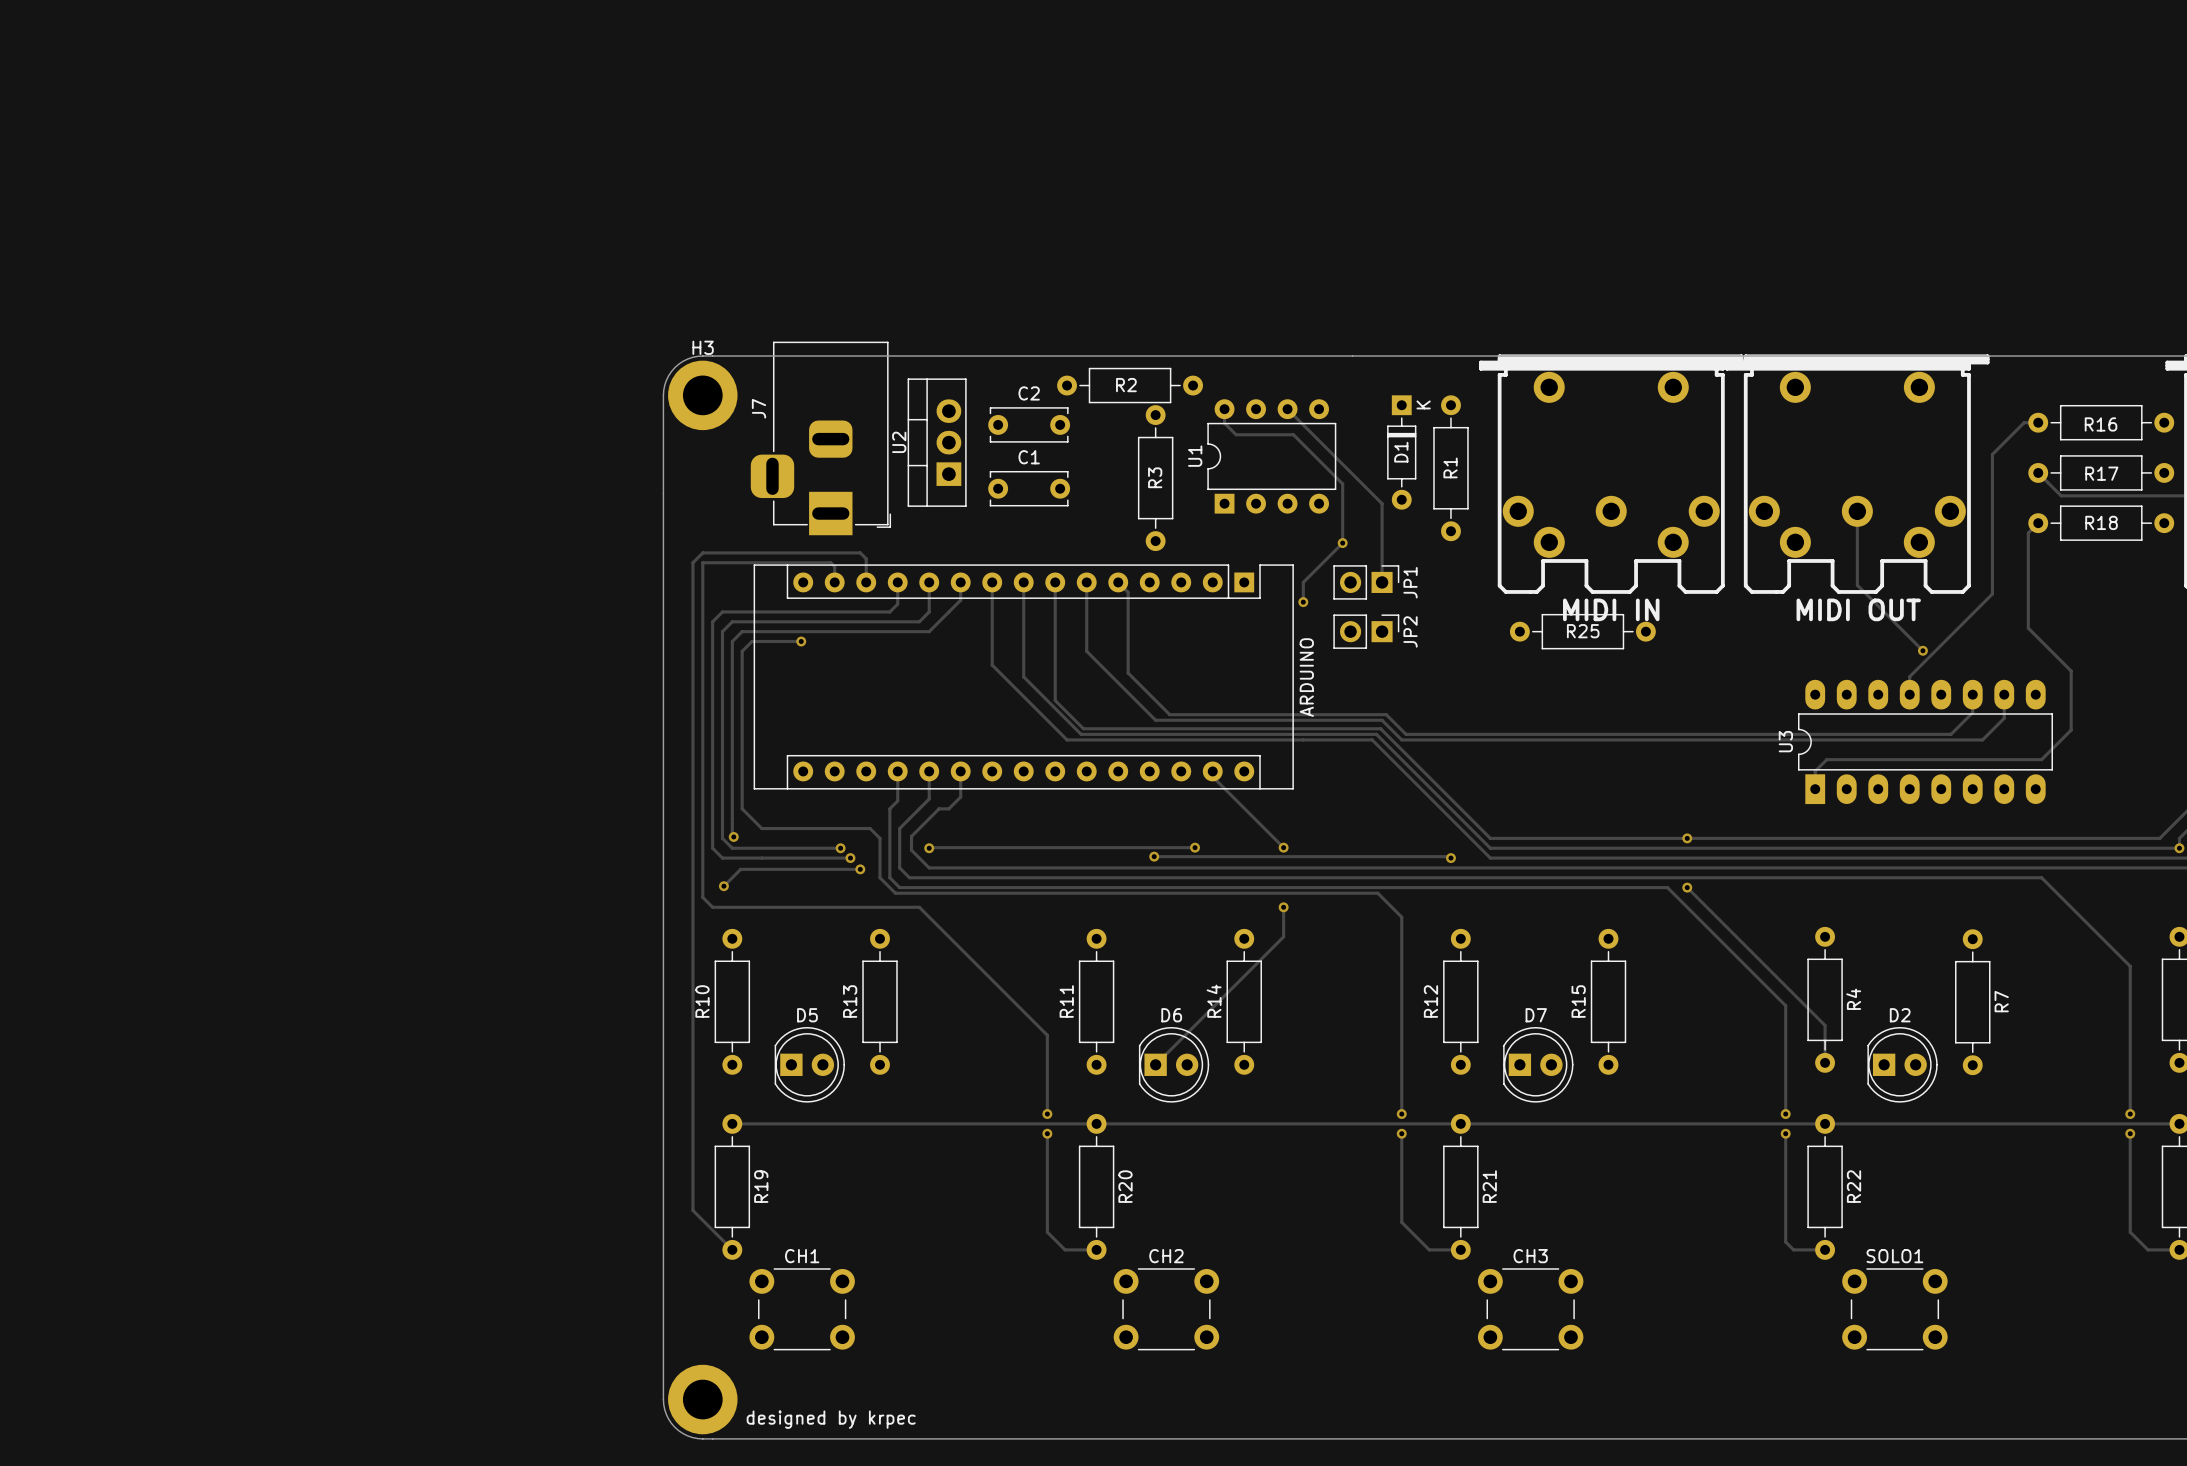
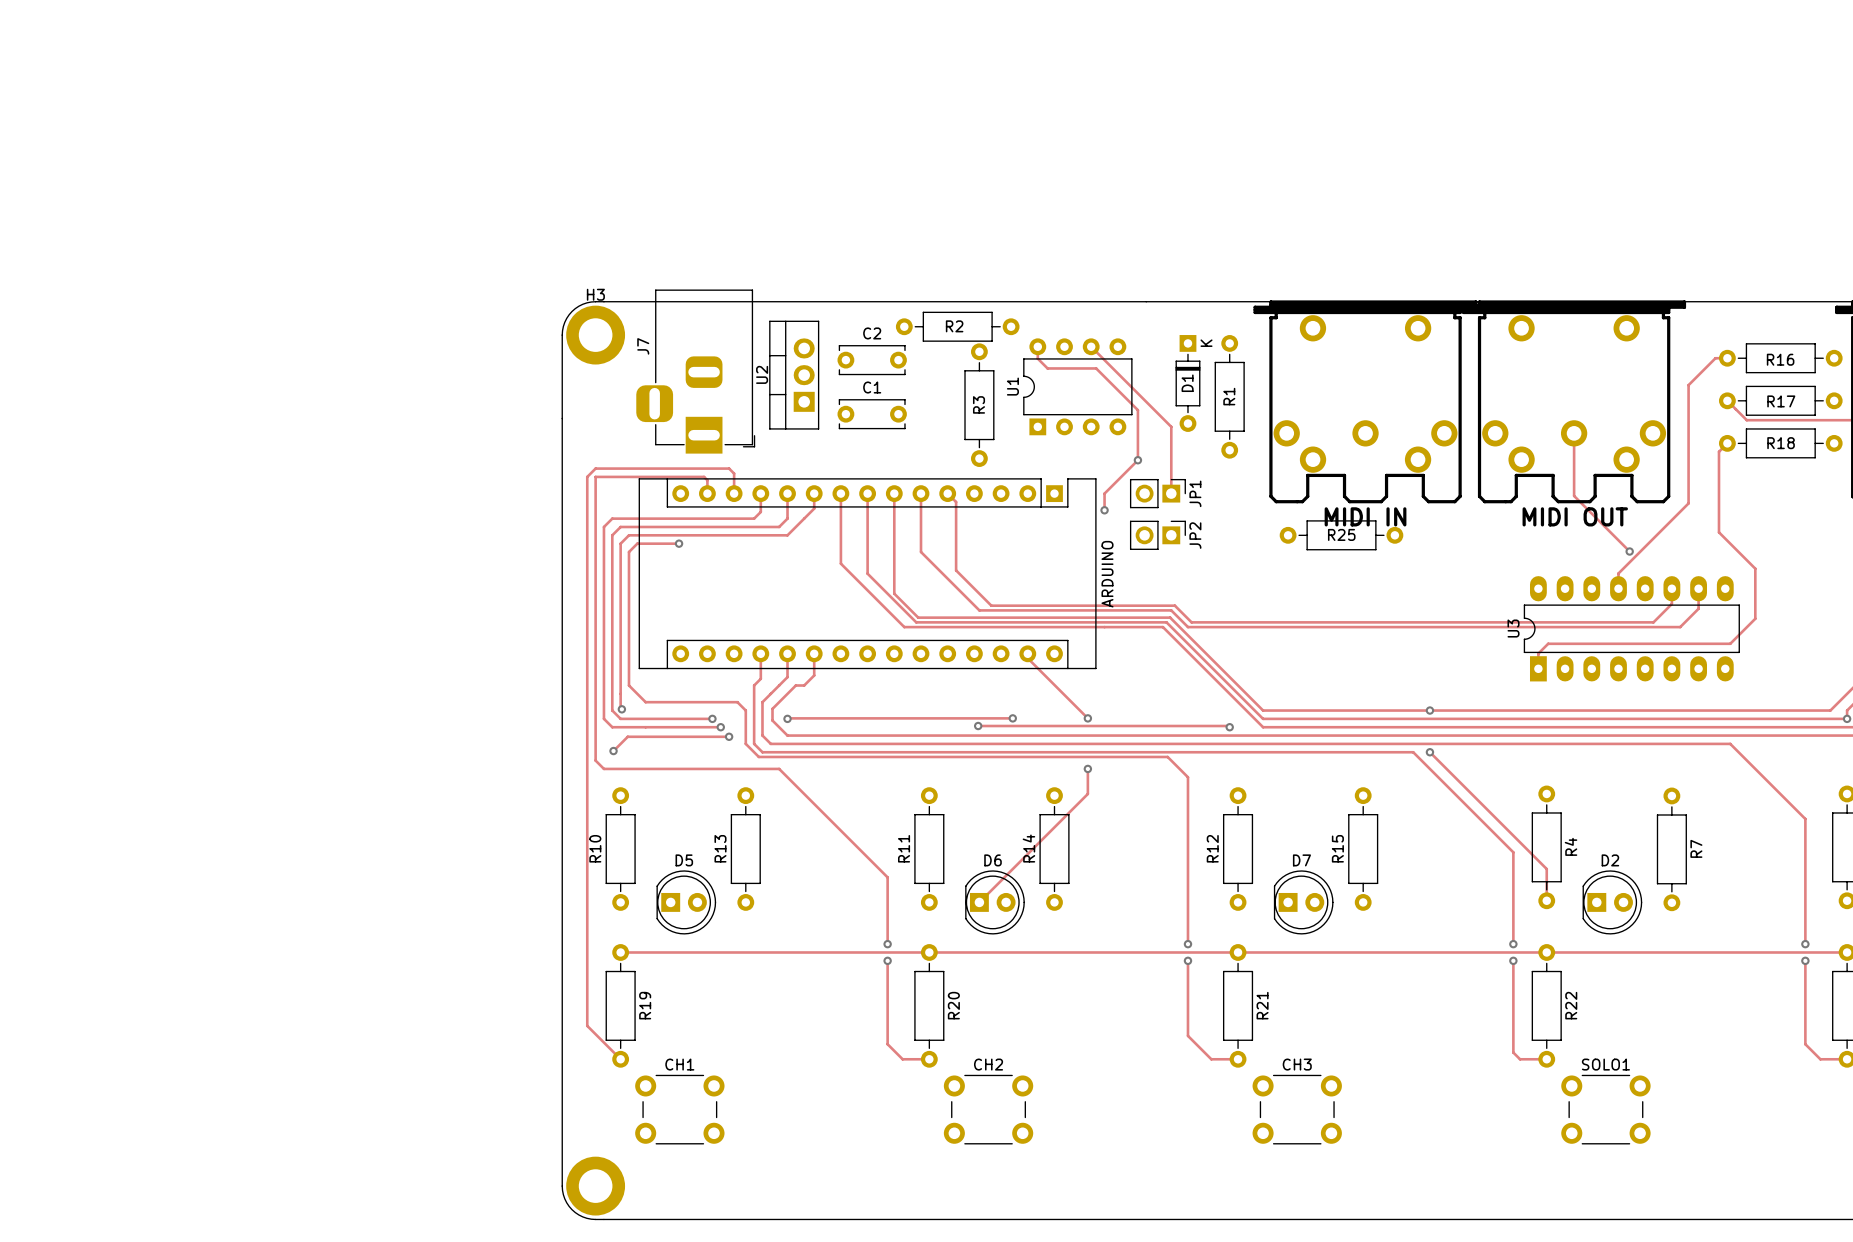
text: designed by krpec (831, 1419) -> none

